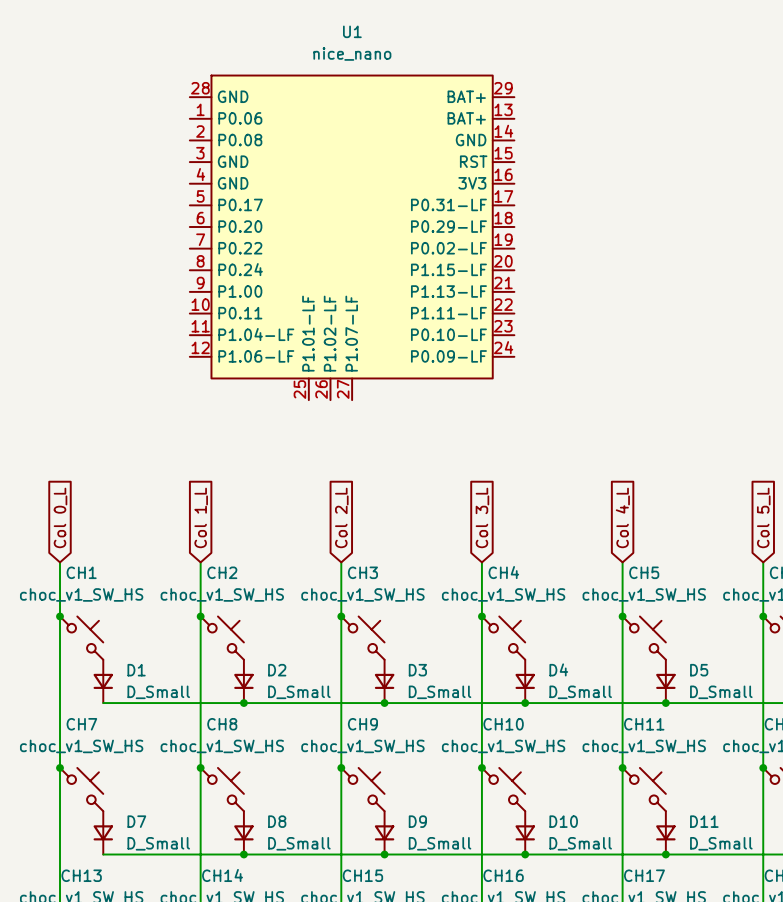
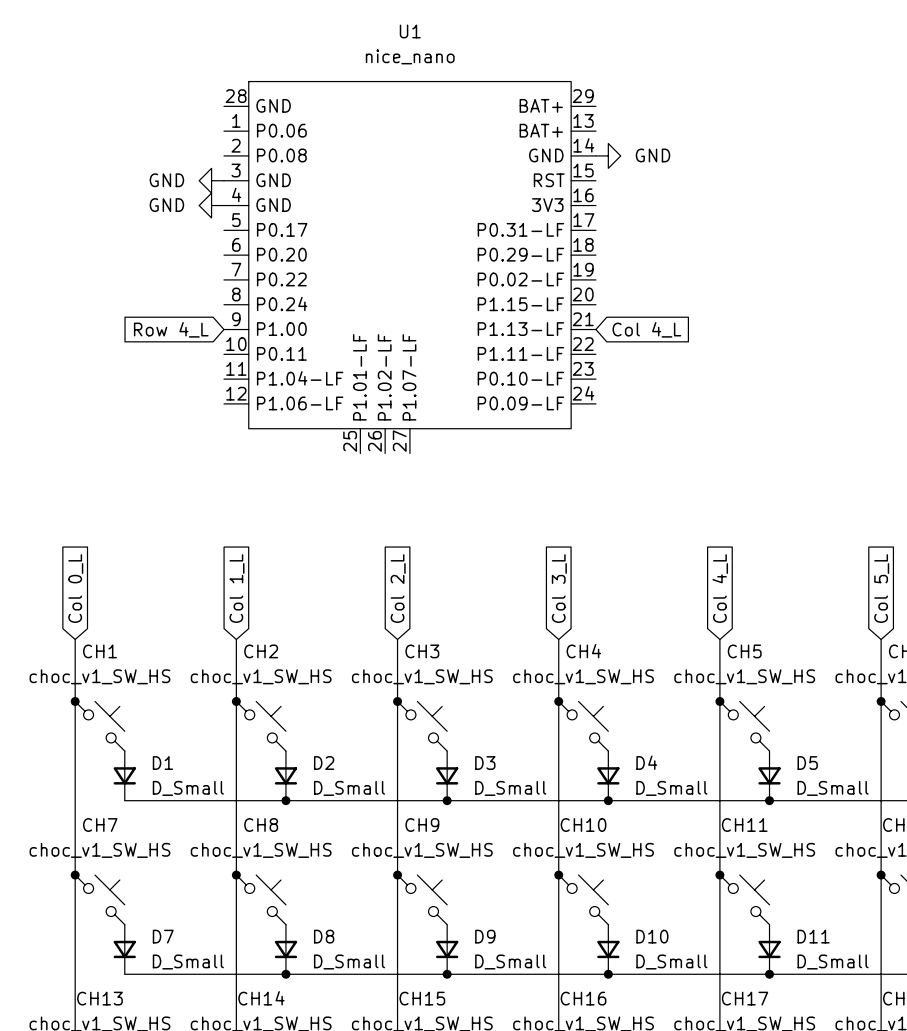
power symbol: none -> GND (608, 155)
power symbol: none -> GND (211, 180)
power symbol: none -> GND (211, 205)
global label: none -> Row 4_L (171, 329)
global label: none -> Col 4_L (646, 329)

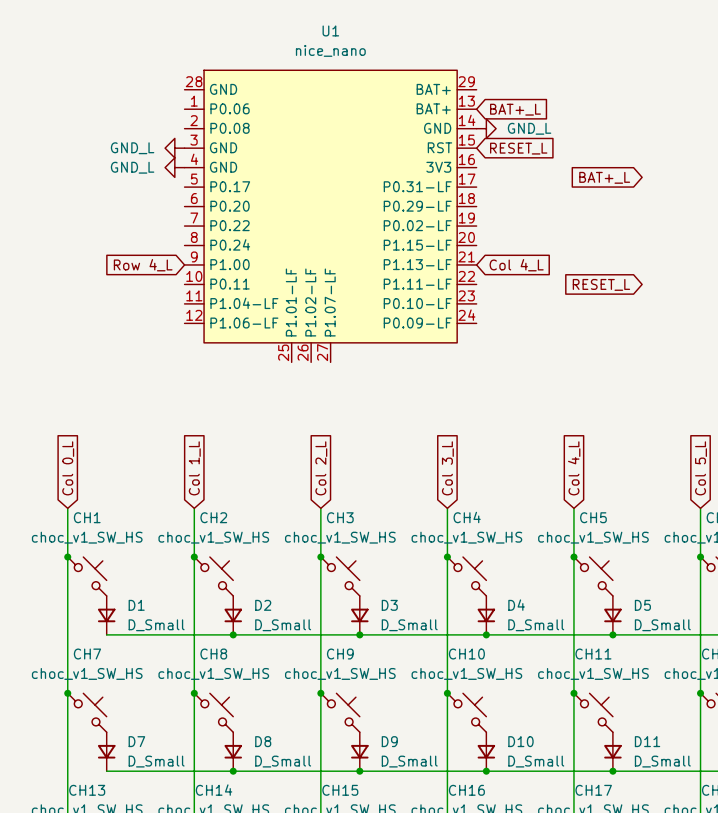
global label: none -> BAT+_L (515, 109)
power symbol: GND (608, 155) -> GND_L (486, 128)
power symbol: GND (211, 180) -> GND_L (174, 148)
global label: none -> RESET_L (518, 148)
power symbol: GND (211, 205) -> GND_L (174, 167)
global label: none -> BAT+_L (604, 177)
global label: none -> RESET_L (601, 284)

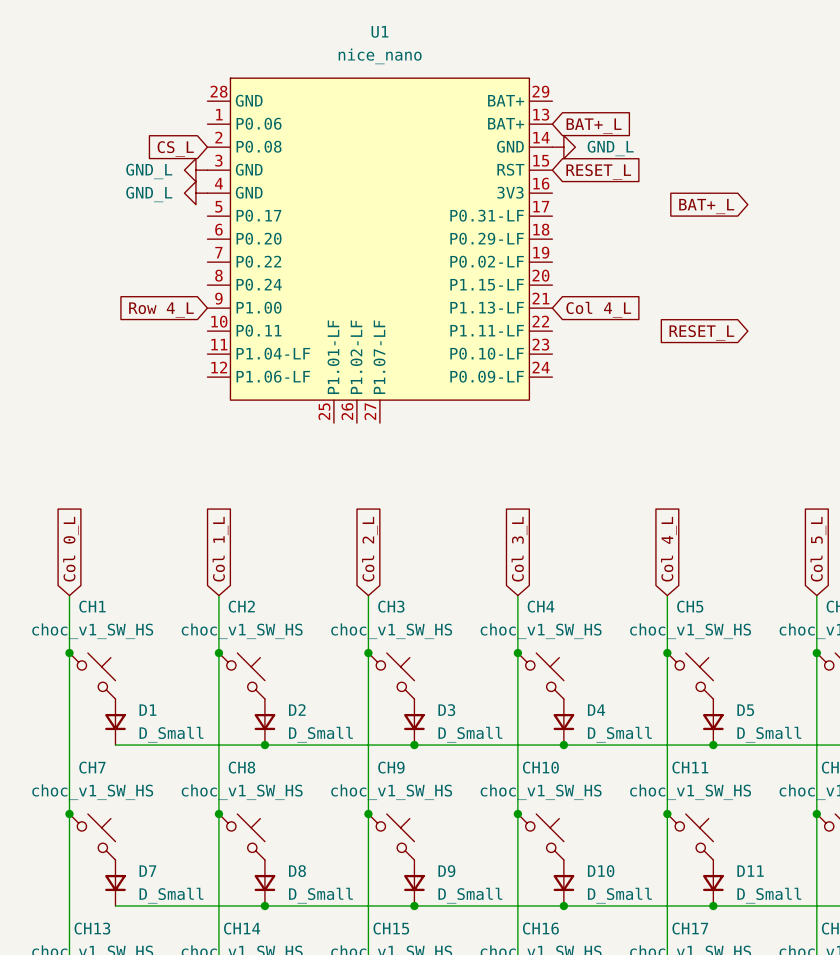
global label: none -> CS_L (175, 148)

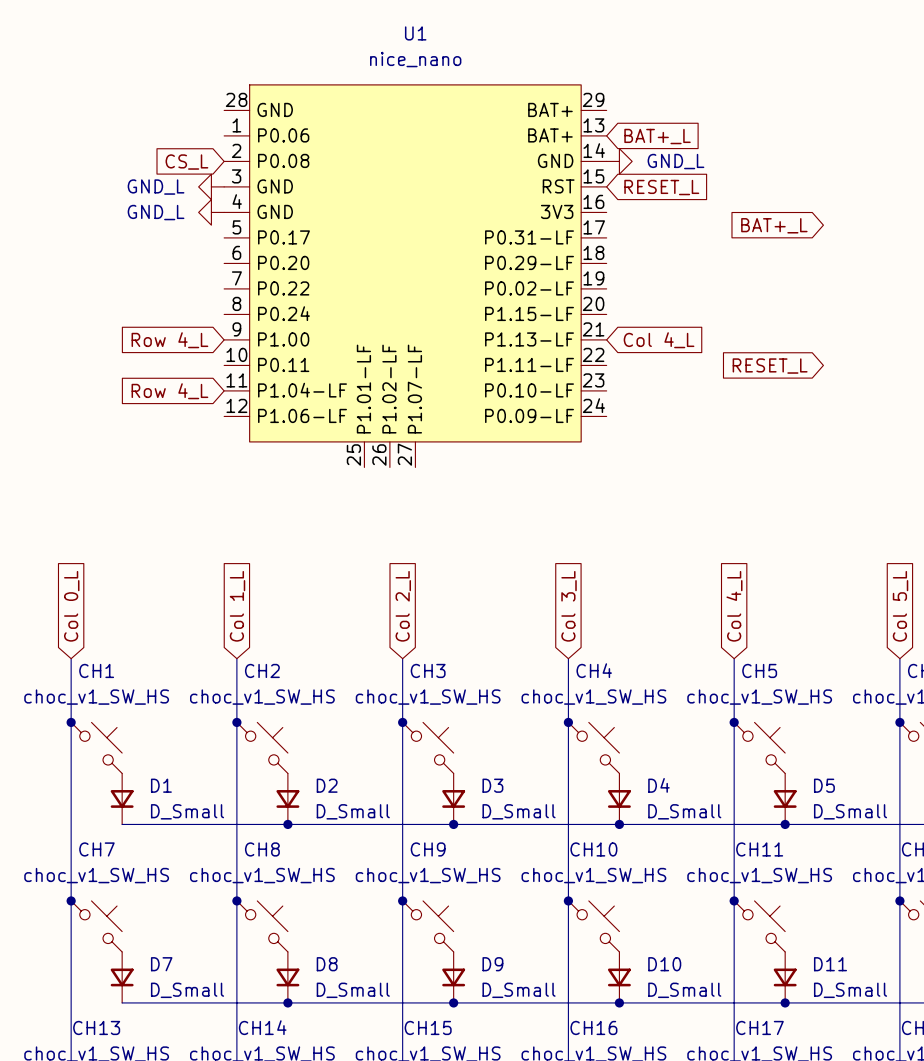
global label: none -> Row 4_L (169, 391)

